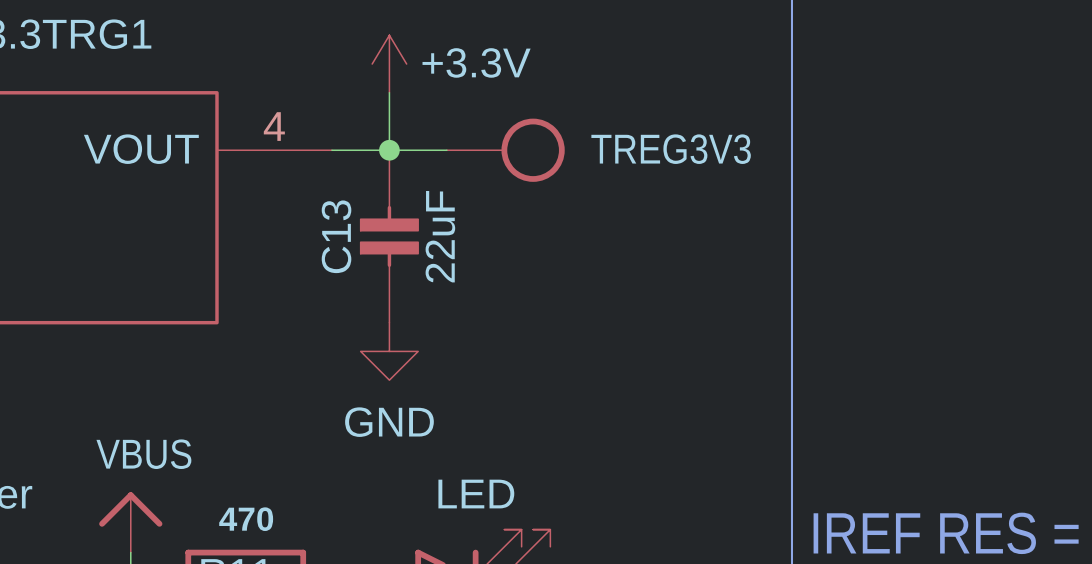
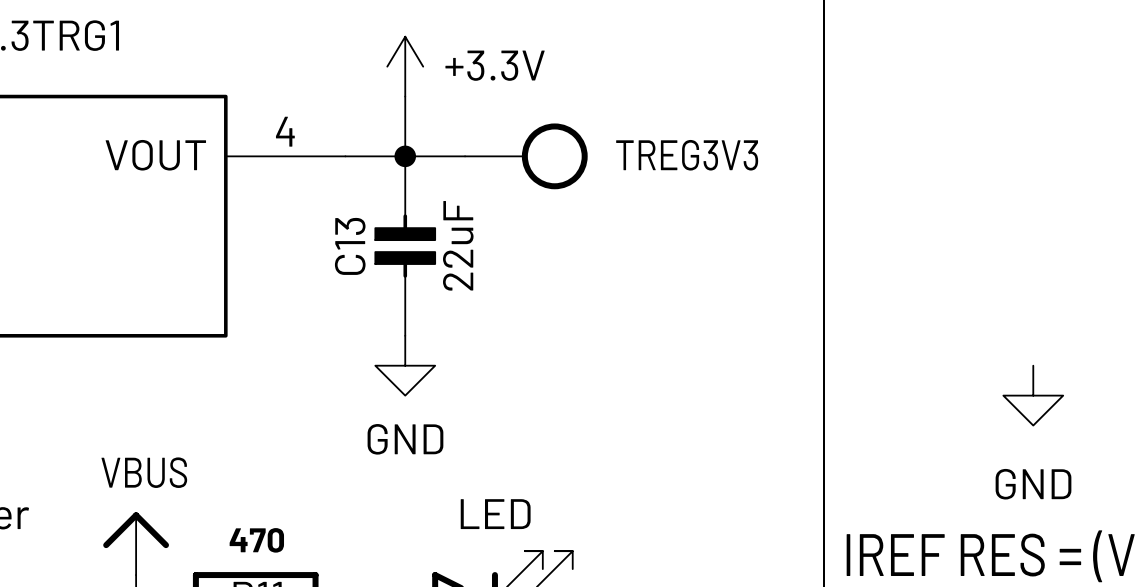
power symbol: none -> GND (1033, 395)

